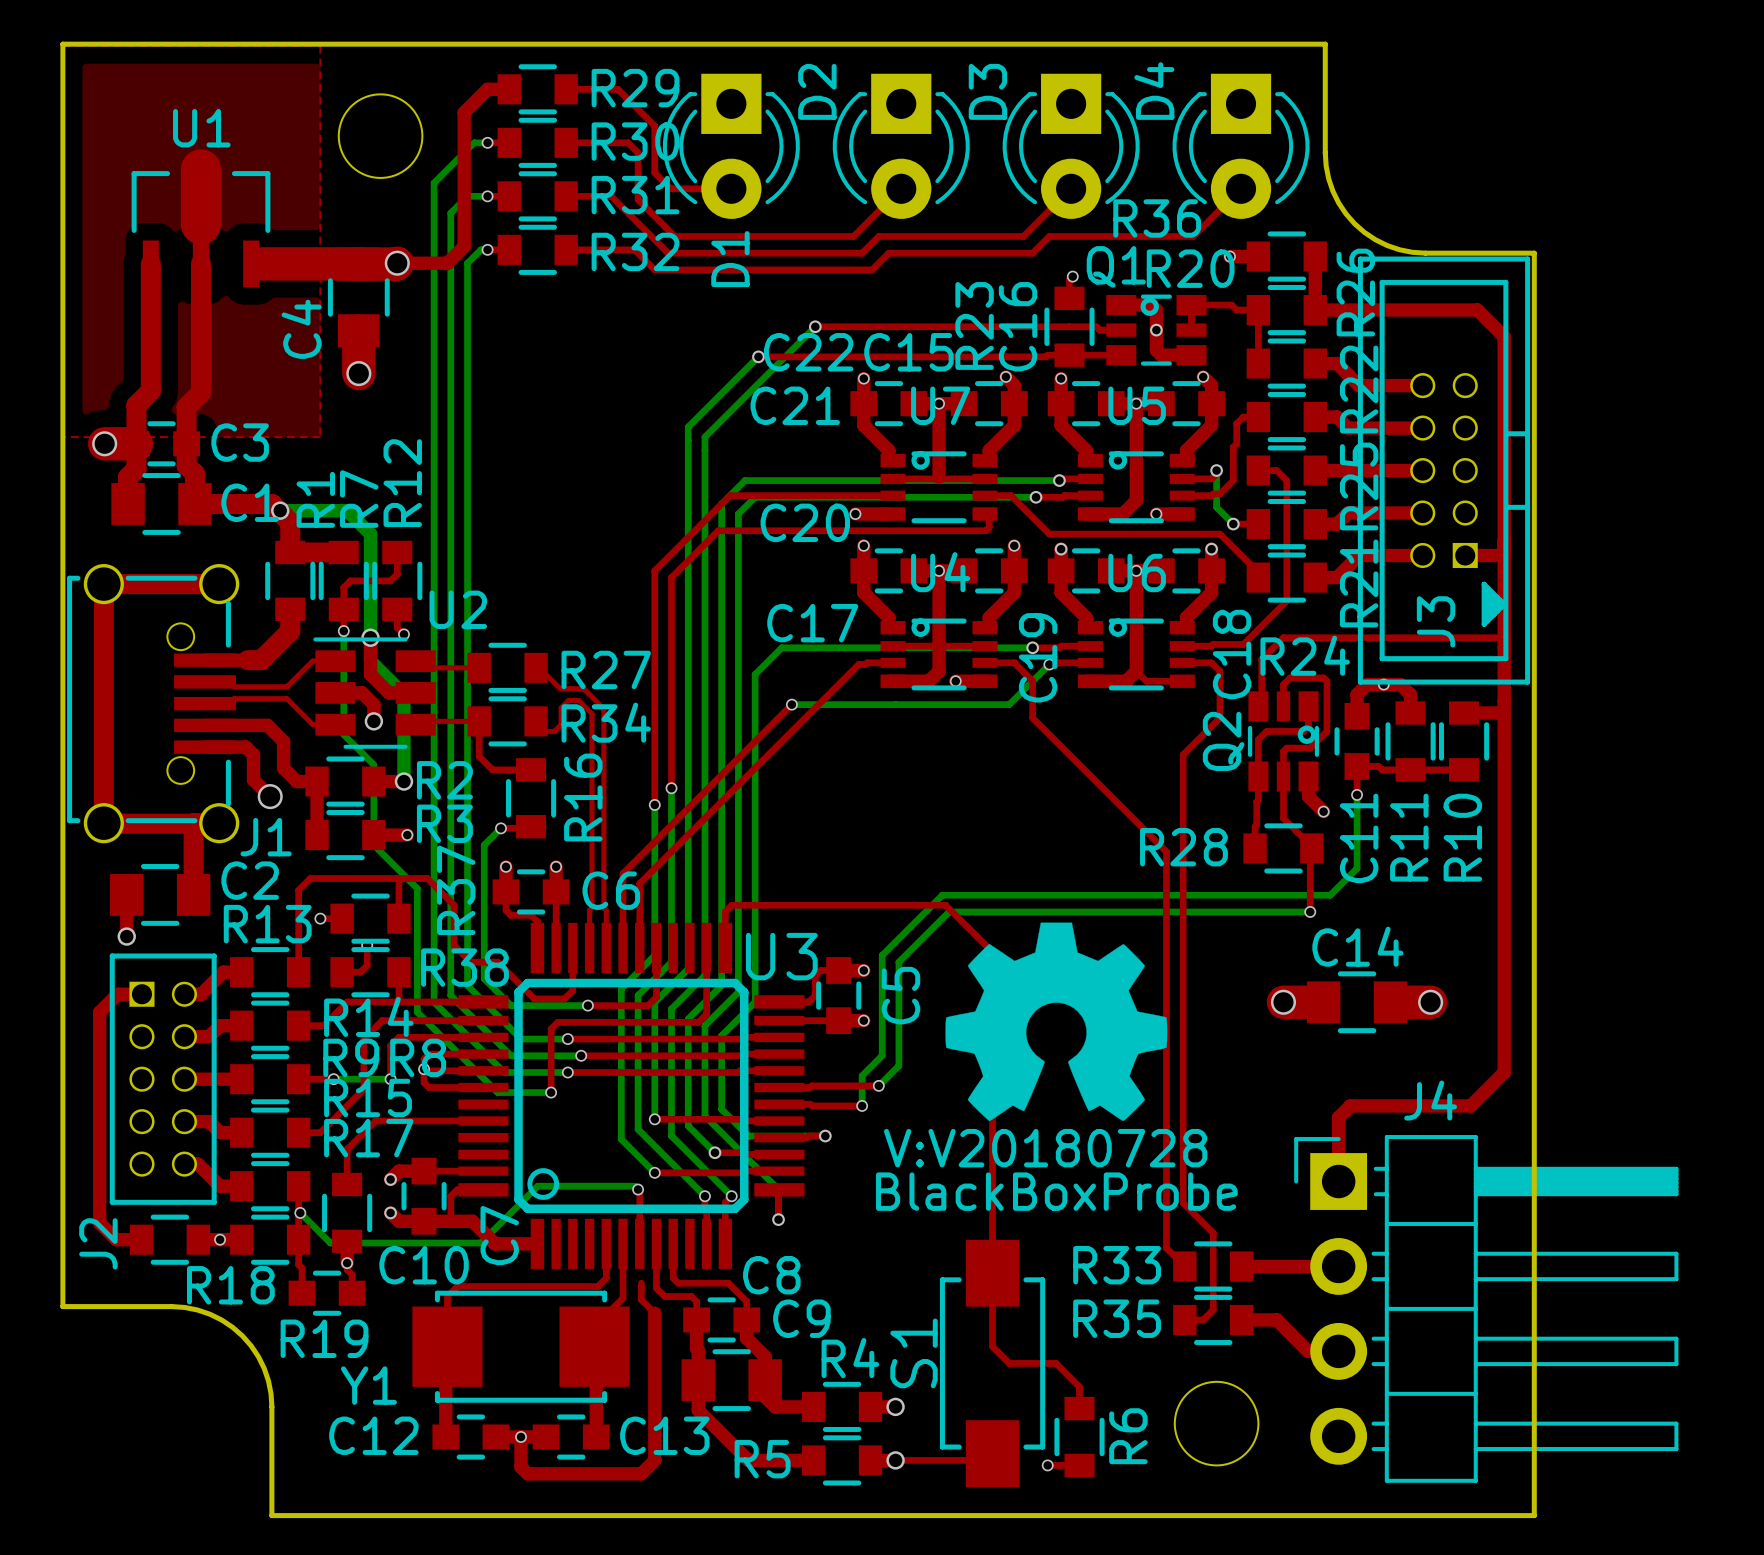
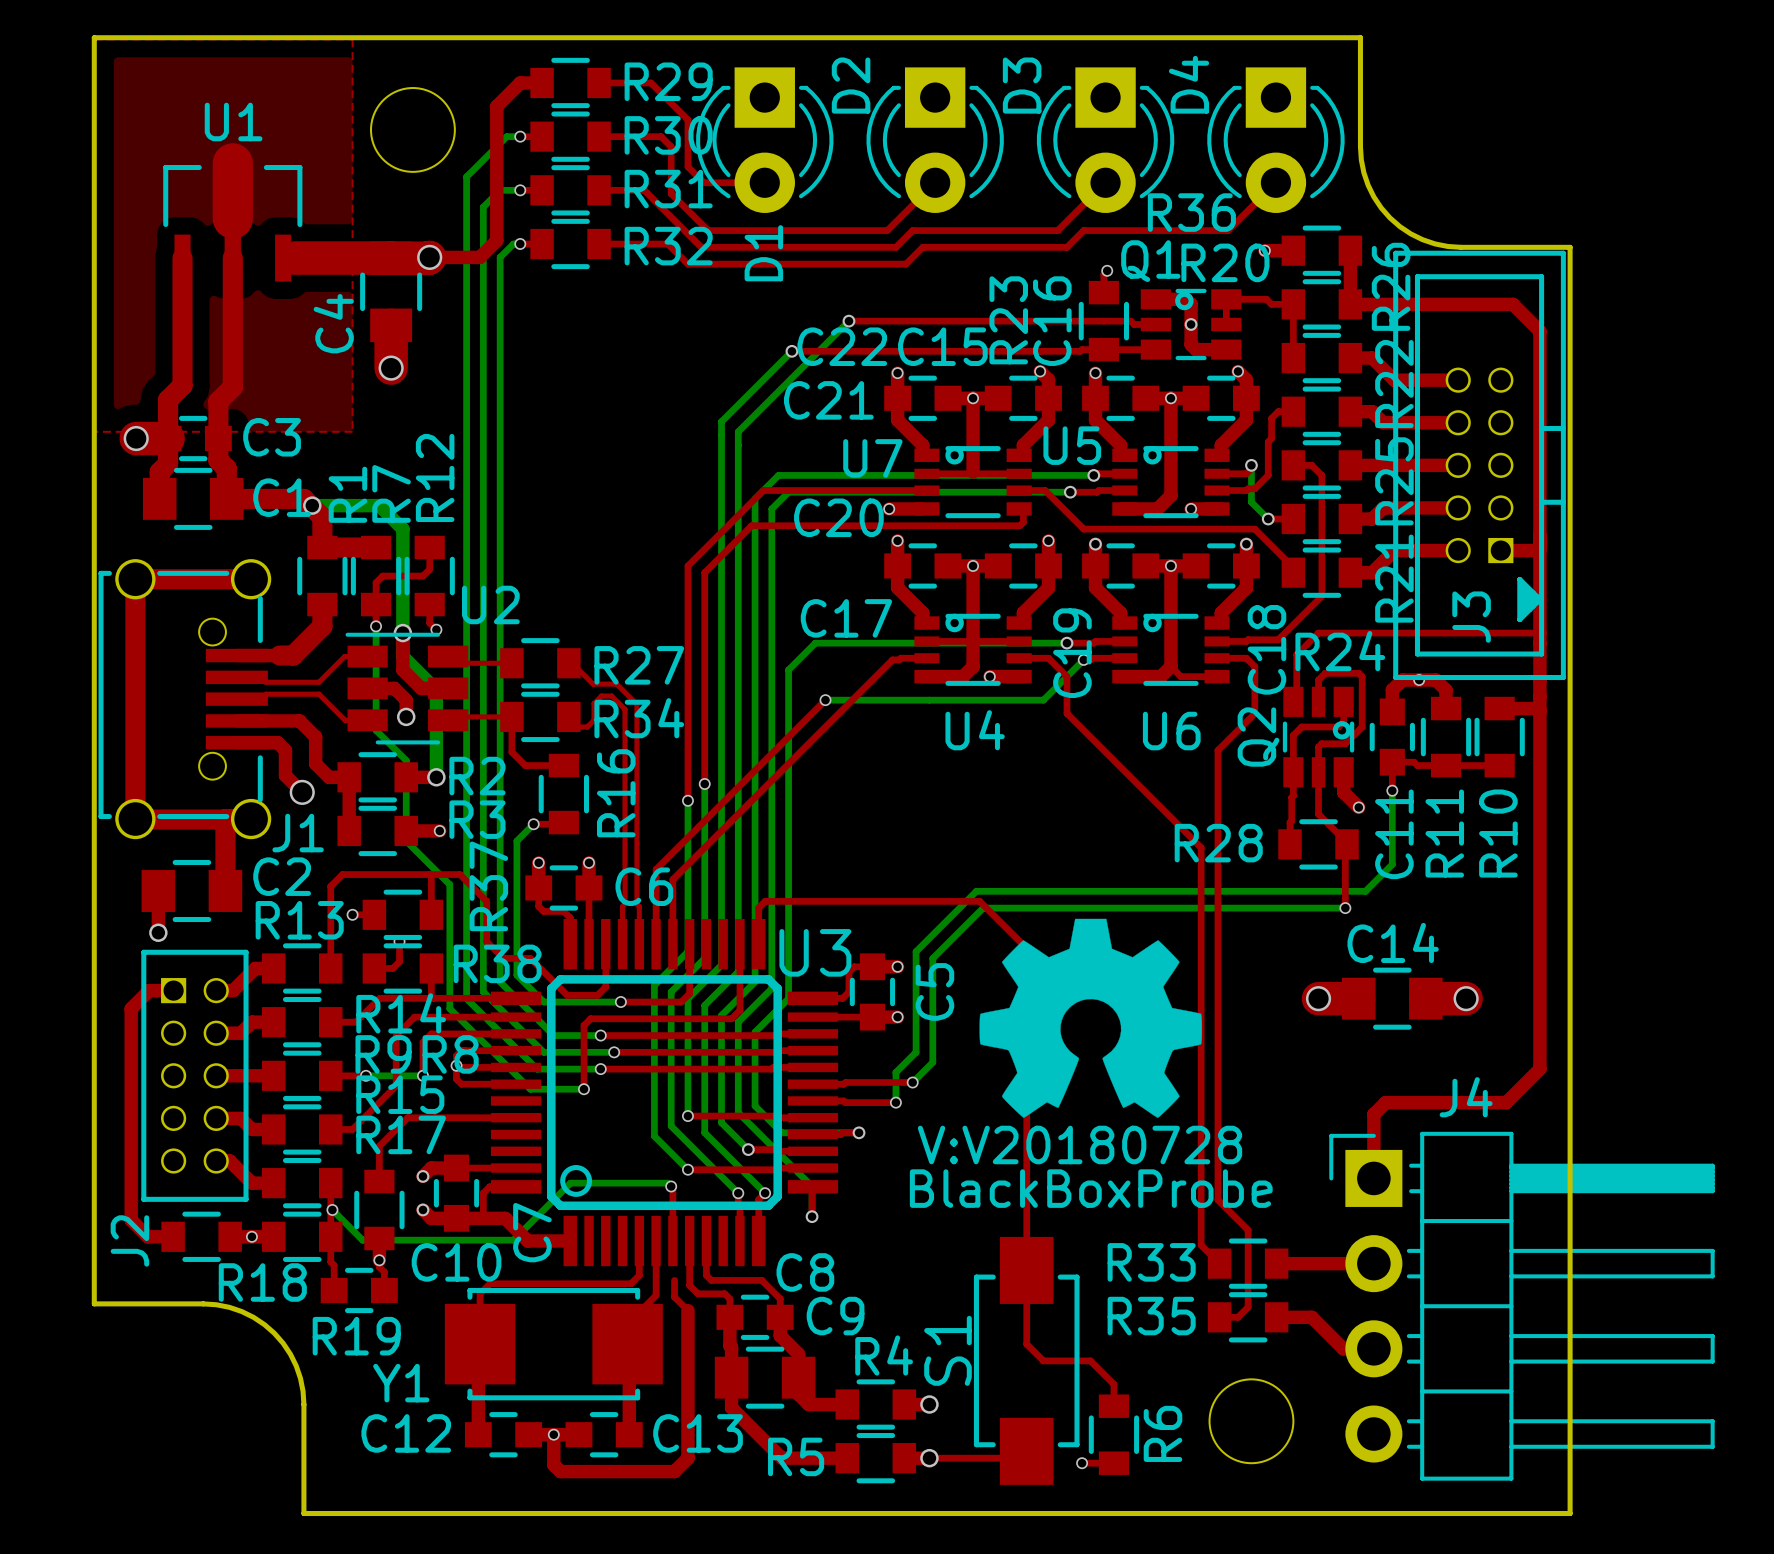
U7 name position: U7 (940, 405) -> U7 (872, 458)
U5 name position: U5 (1137, 405) -> U5 (1072, 445)
U4 name position: U4 (940, 572) -> U4 (975, 730)
U6 name position: U6 (1137, 572) -> U6 (1171, 731)

